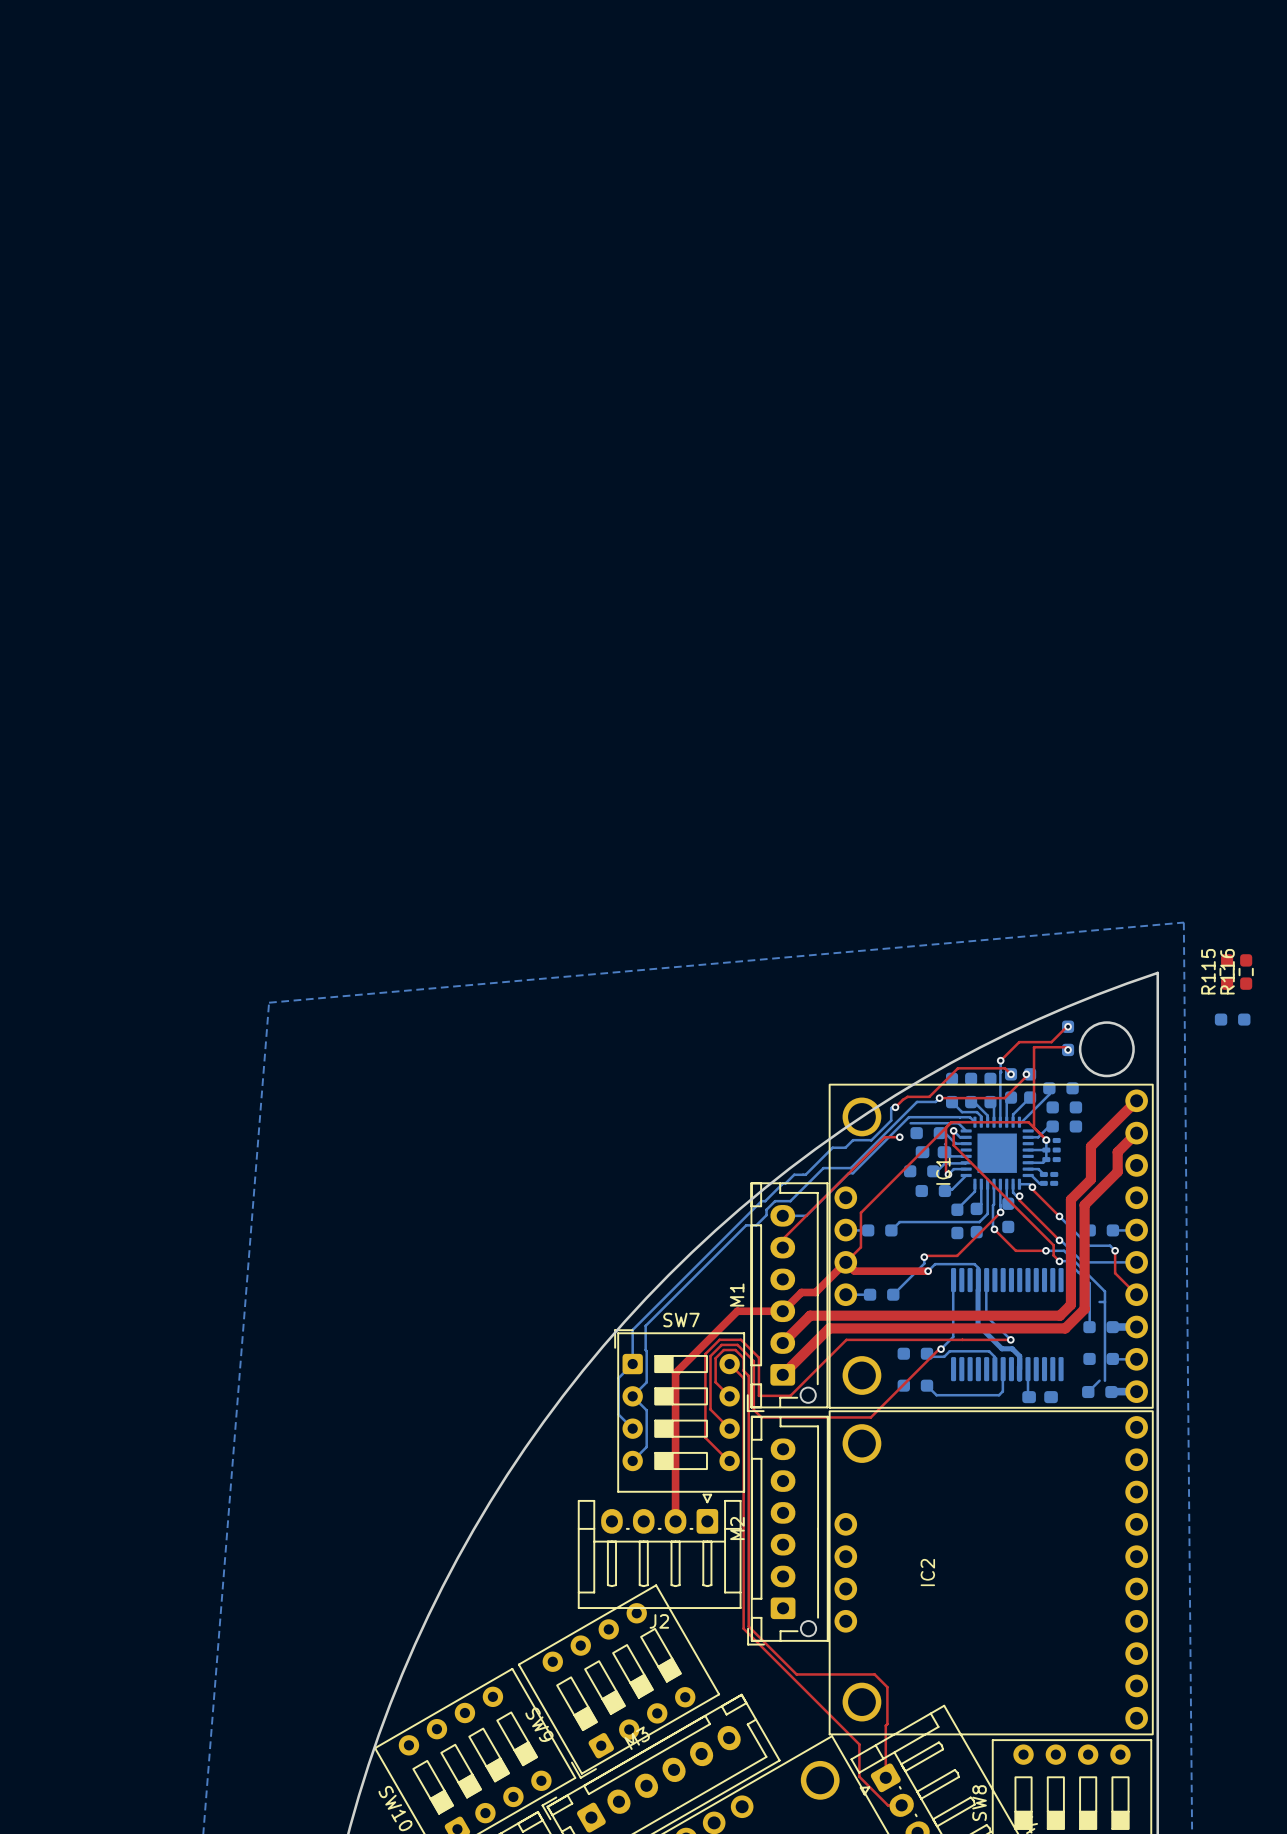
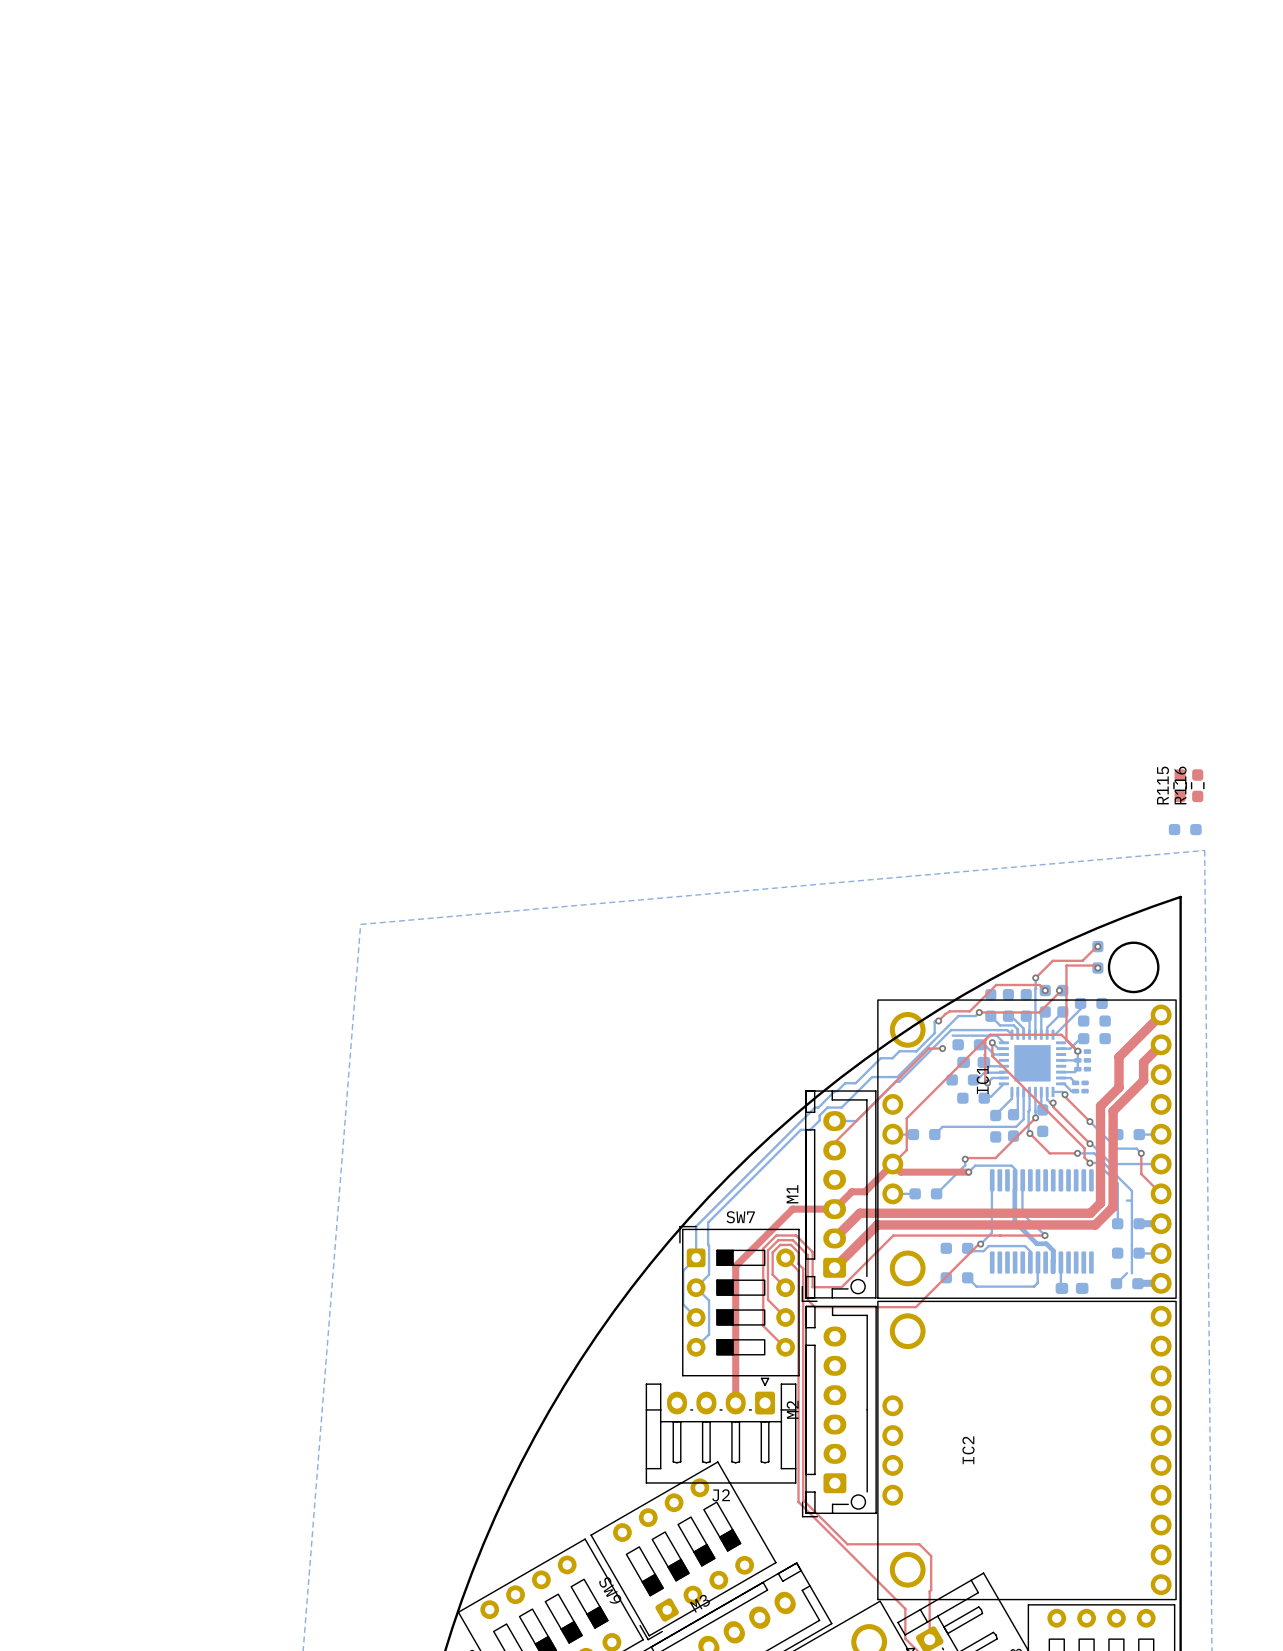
R115 position: (1227, 972) -> (1180, 785)
R116 position: (1246, 972) -> (1197, 785)
part position: (1232, 1019) -> (1185, 829)

